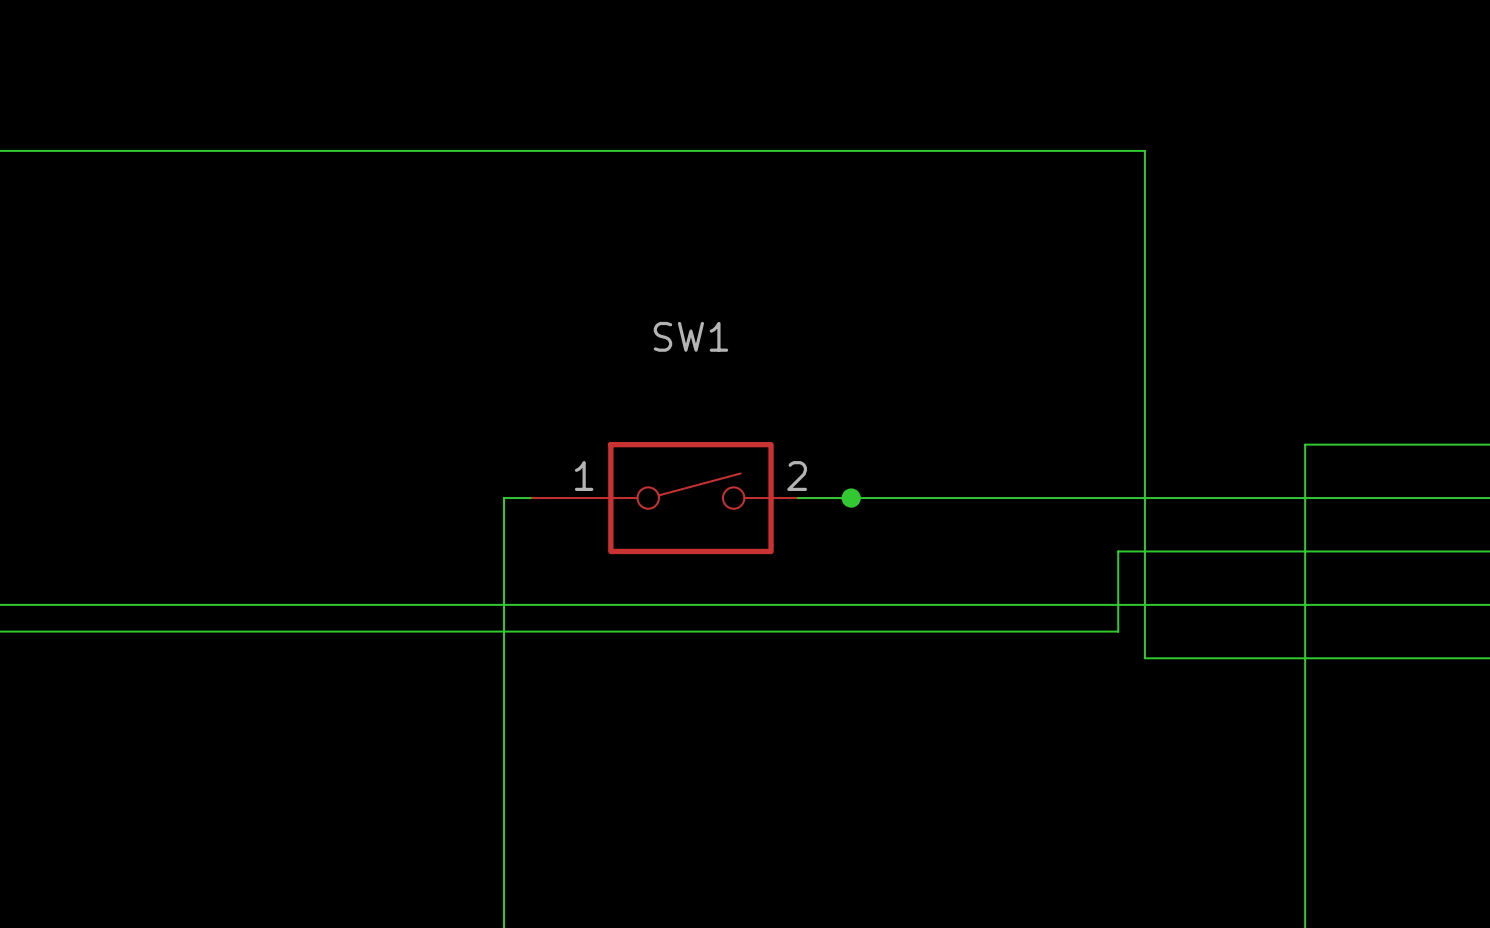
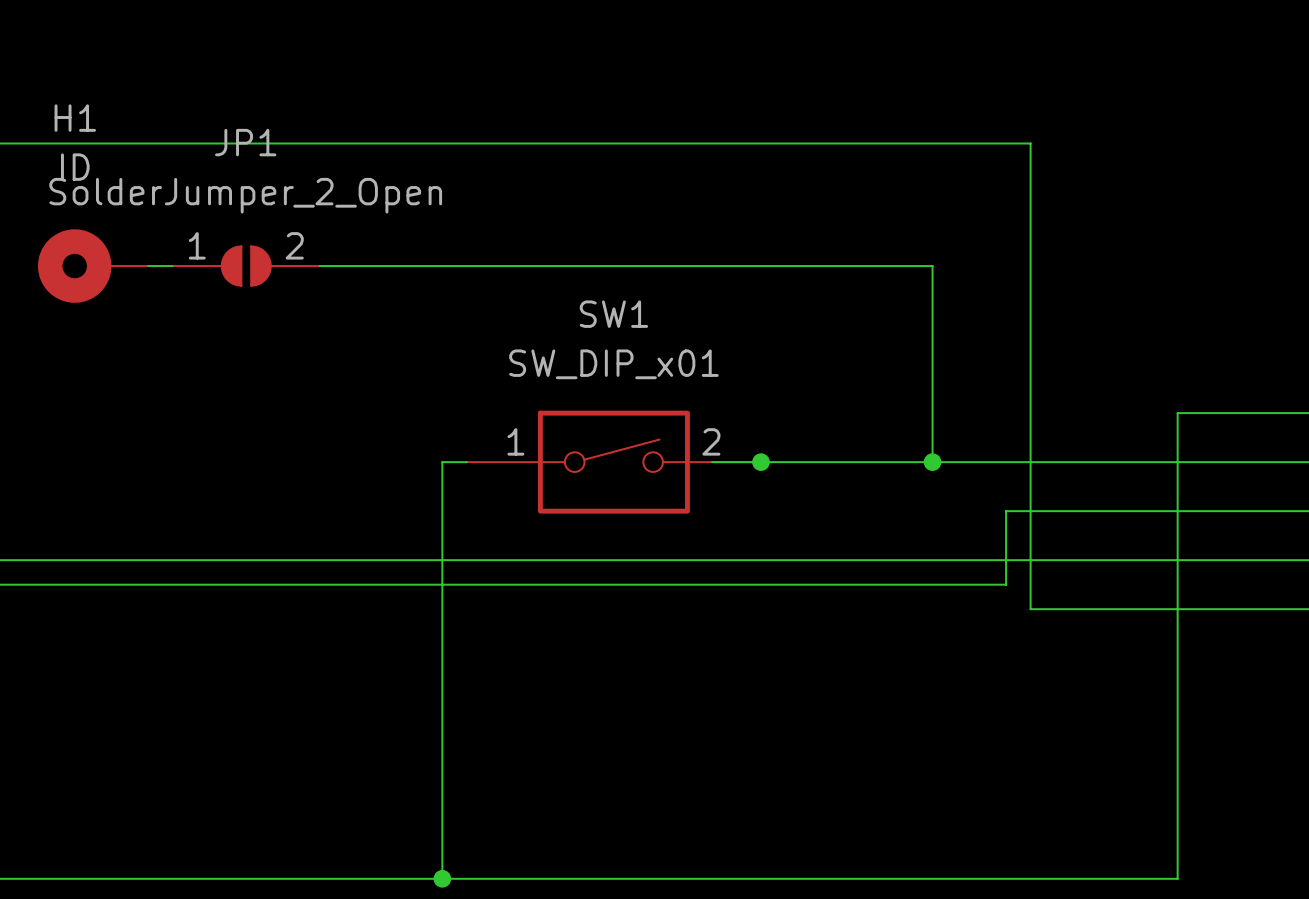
H1: none -> ID (93, 266)
wire: none -> (148, 266) (172, 266)
JP1: none -> SolderJumper_2_Open (246, 266)
wire: none -> (319, 266) (932, 266) (932, 462)
SW1 value: none -> SW_DIP_x01 (613, 364)
junction: none -> (932, 462)

